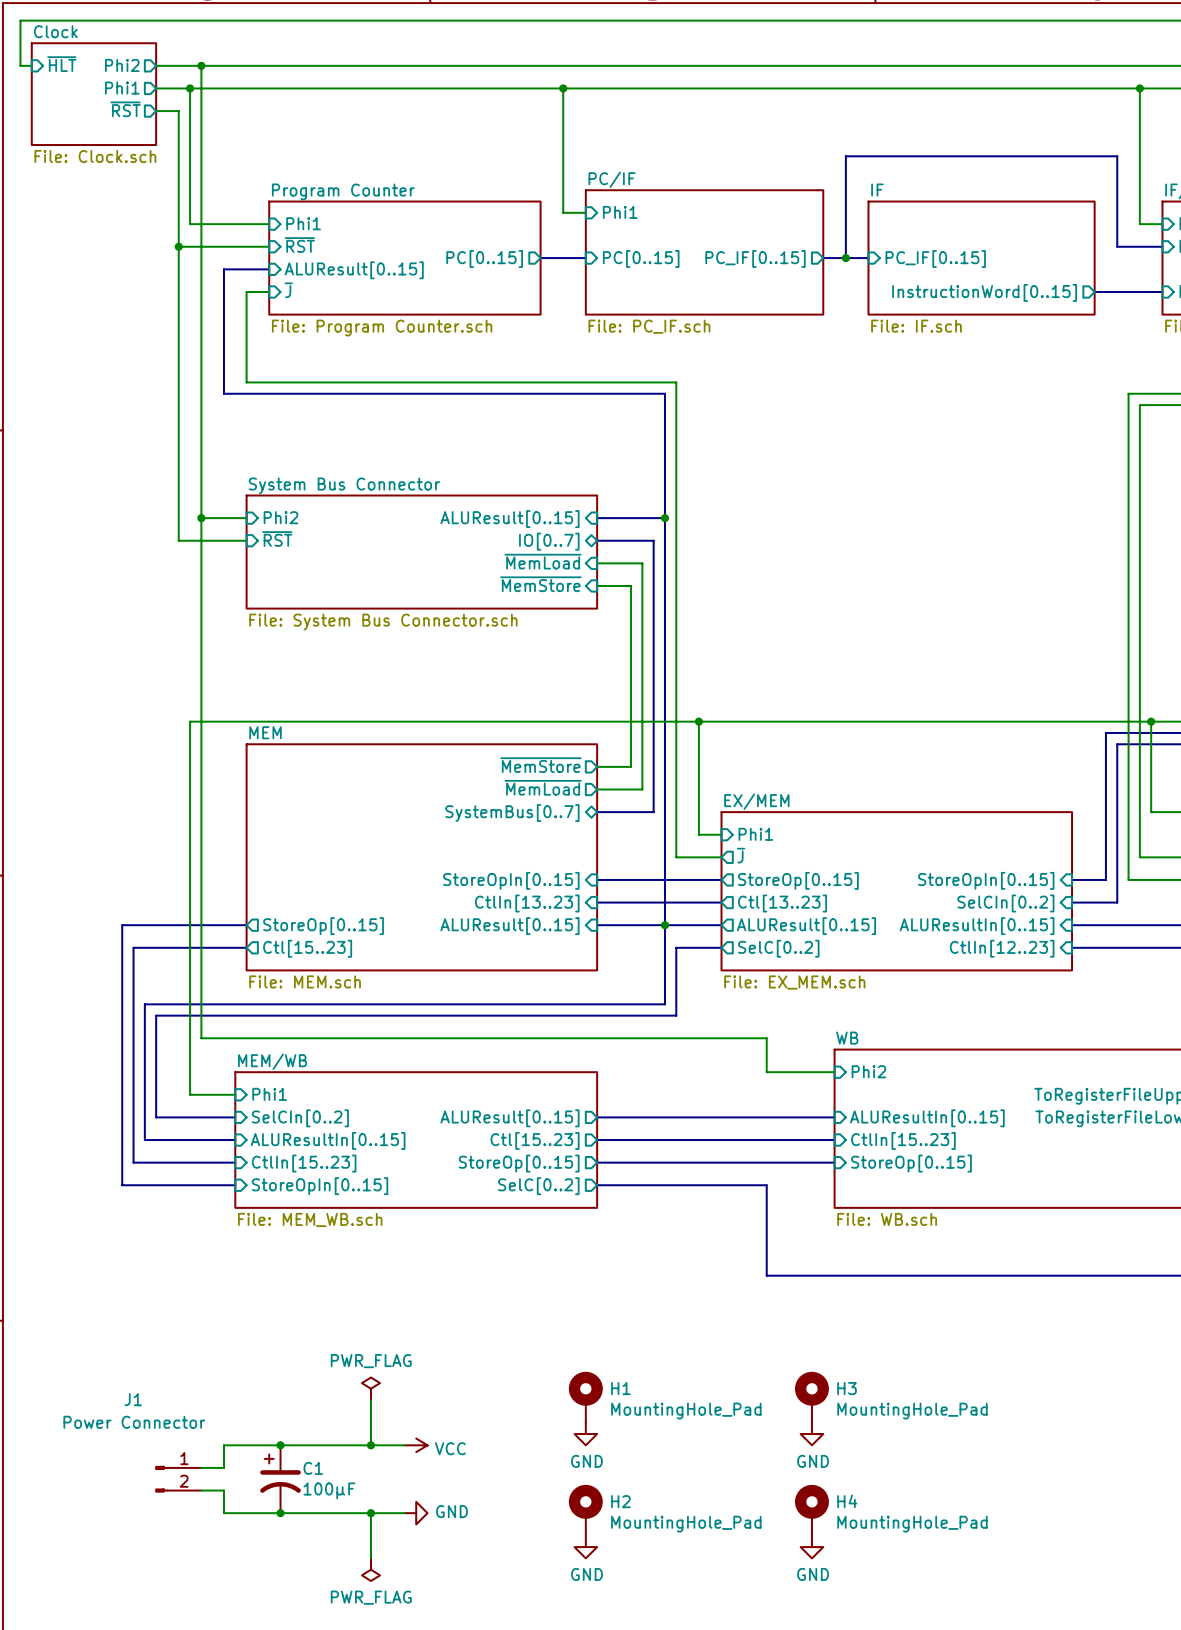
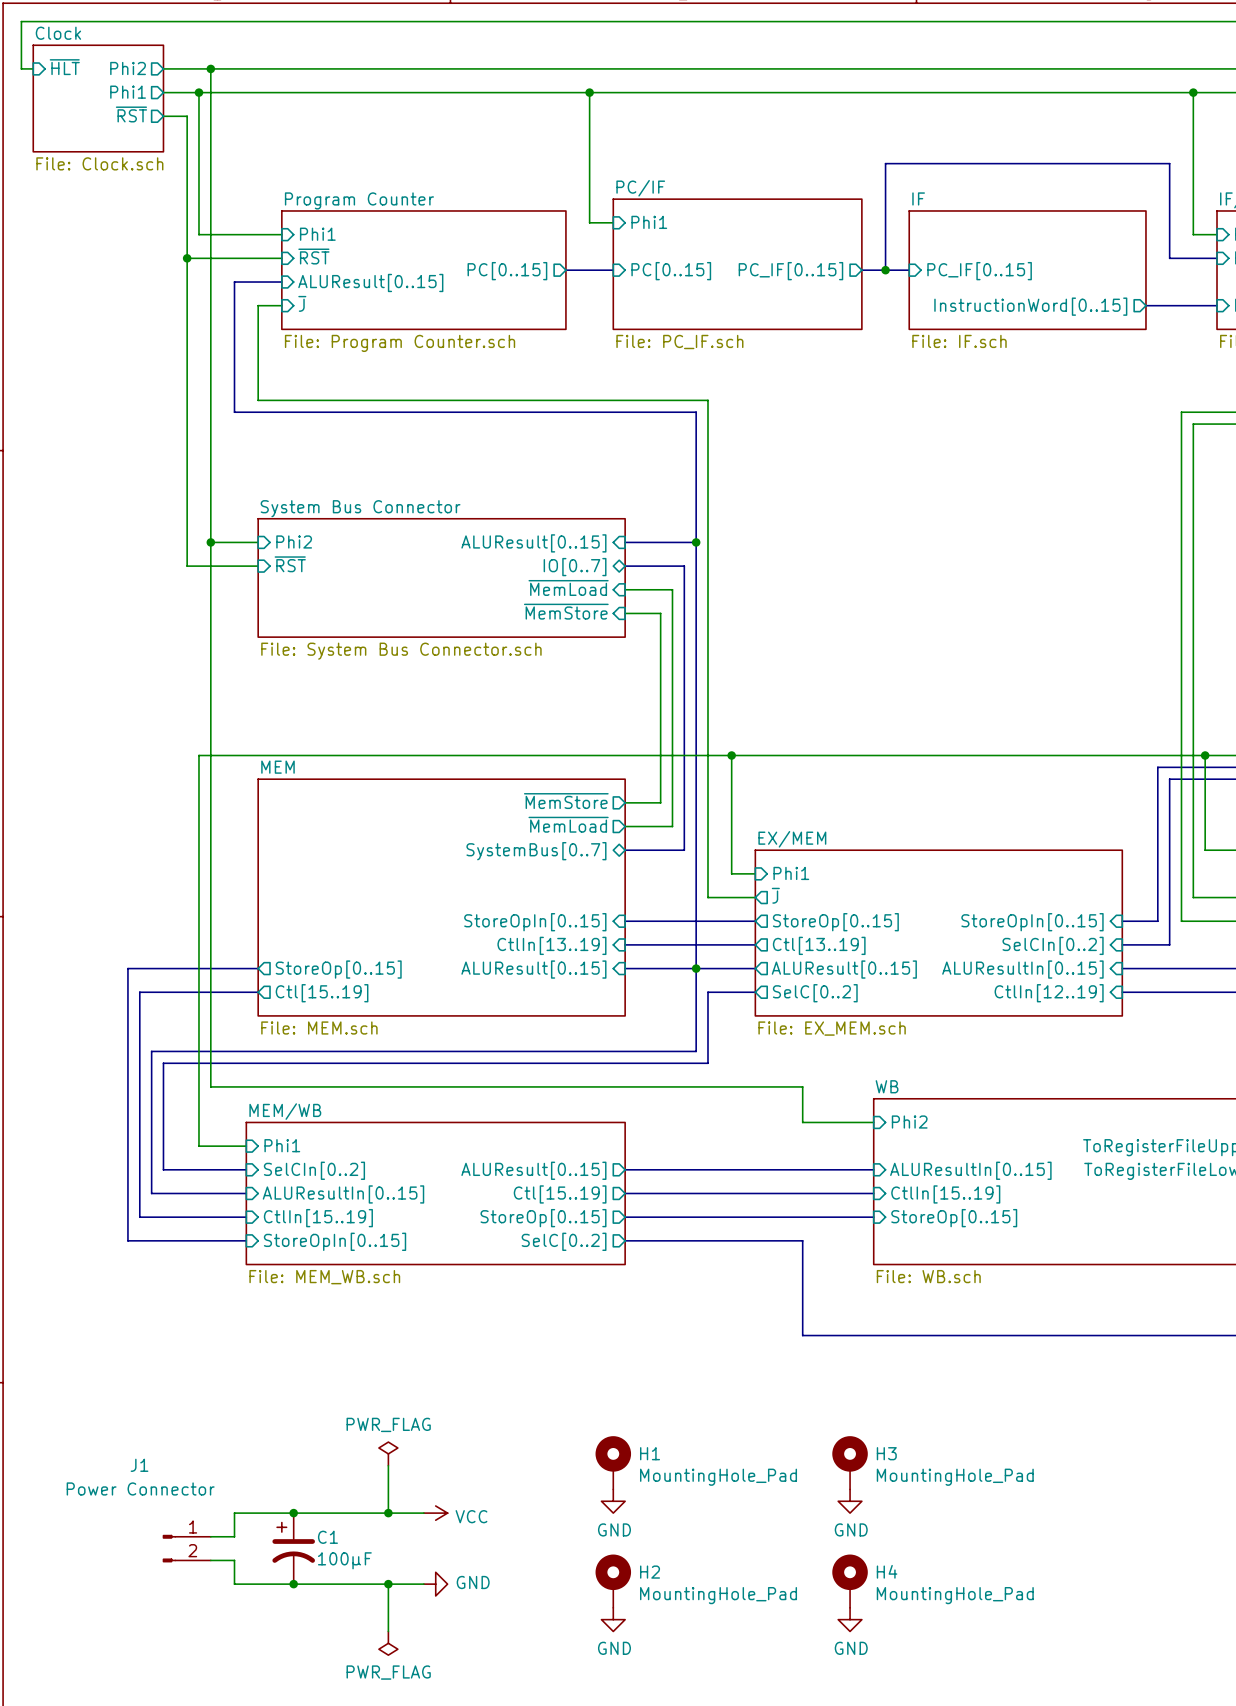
sheet pin: CtlIn[13..23] (527, 903) -> CtlIn[13..19] (551, 945)
sheet pin: Ctl[13..23] (782, 903) -> Ctl[13..19] (819, 945)
sheet pin: Ctl[15..23] (307, 948) -> Ctl[15..19] (322, 993)
sheet pin: CtlIn[12..23] (1002, 948) -> CtlIn[12..19] (1049, 993)
sheet pin: Ctl[15..23] (535, 1140) -> Ctl[15..19] (560, 1194)
sheet pin: CtlIn[15..23] (903, 1140) -> CtlIn[15..19] (945, 1194)
sheet pin: CtlIn[15..23] (304, 1163) -> CtlIn[15..19] (318, 1218)

